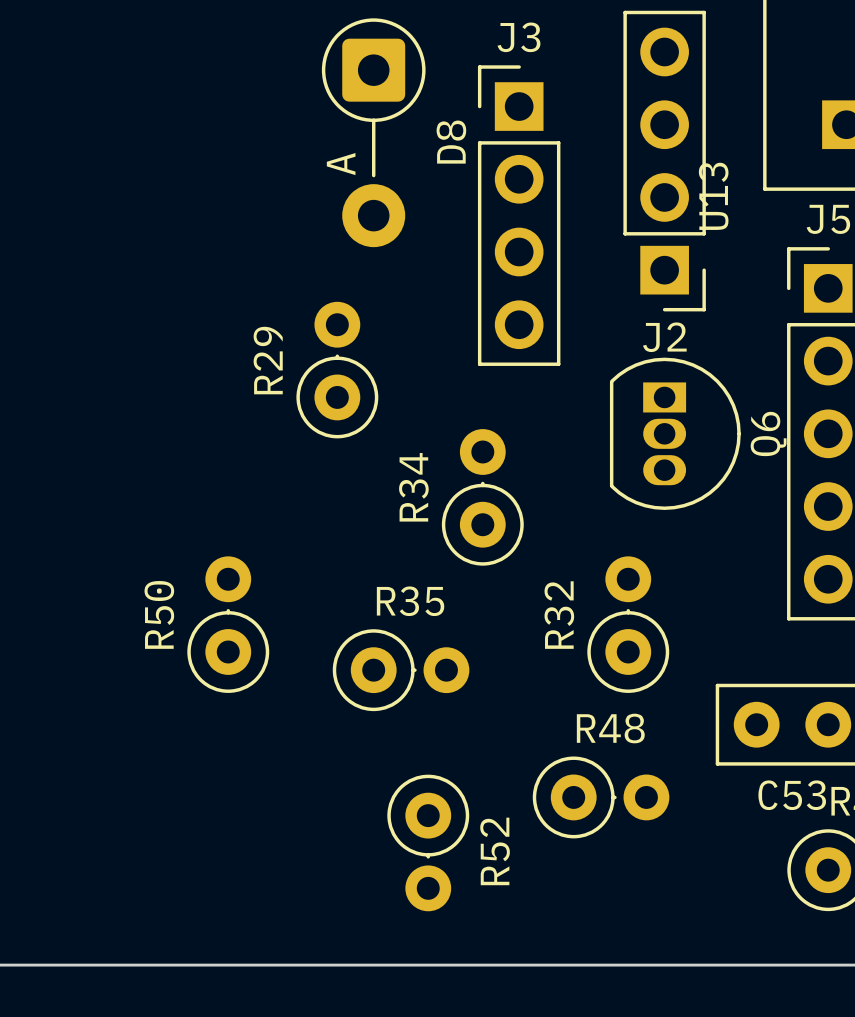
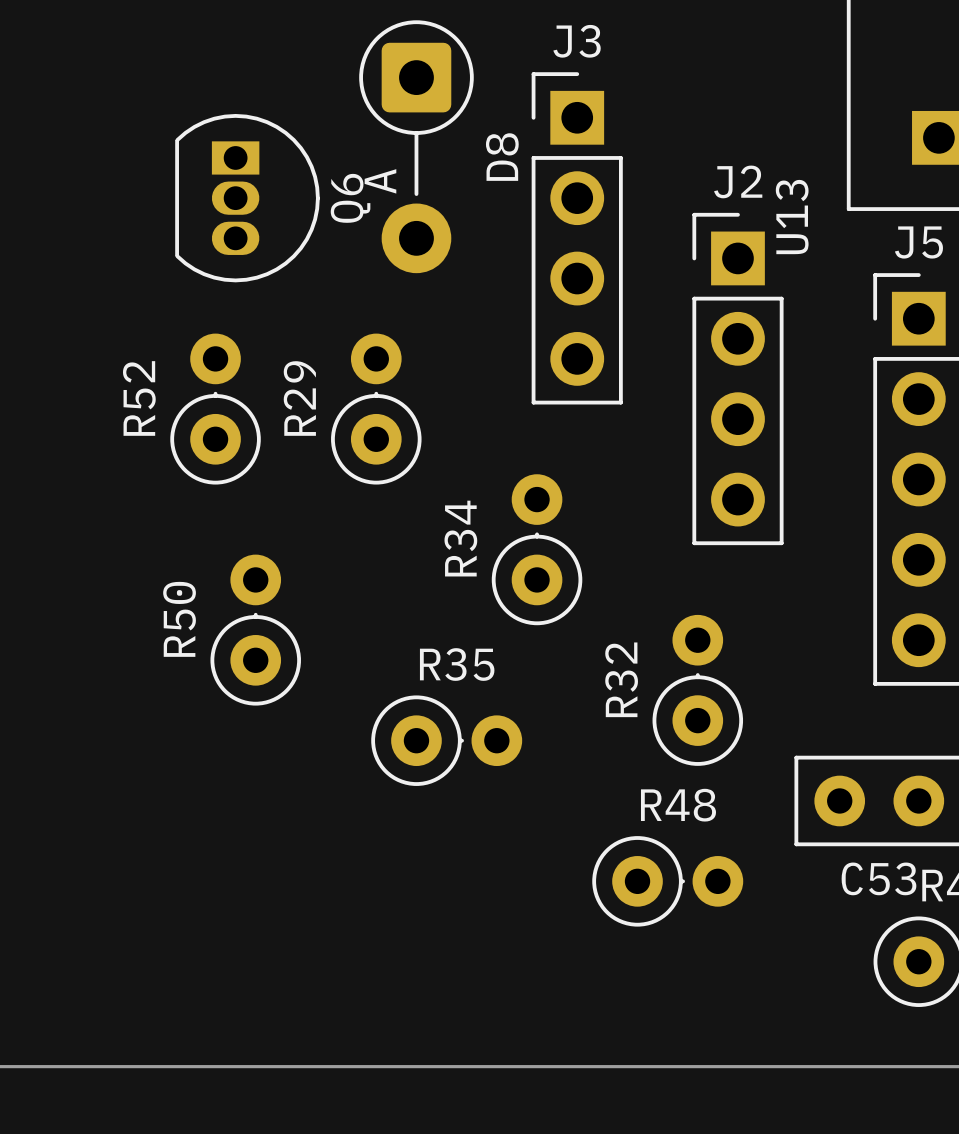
J2 rotation: 0° (664, 161) -> 180° (737, 379)
J2 position: (664, 161) -> (737, 379)
Q6 position: (675, 433) -> (247, 198)
R50 position: (228, 624) -> (255, 630)
R52 rotation: 0° (428, 842) -> 180° (215, 409)
R52 position: (428, 842) -> (215, 409)

